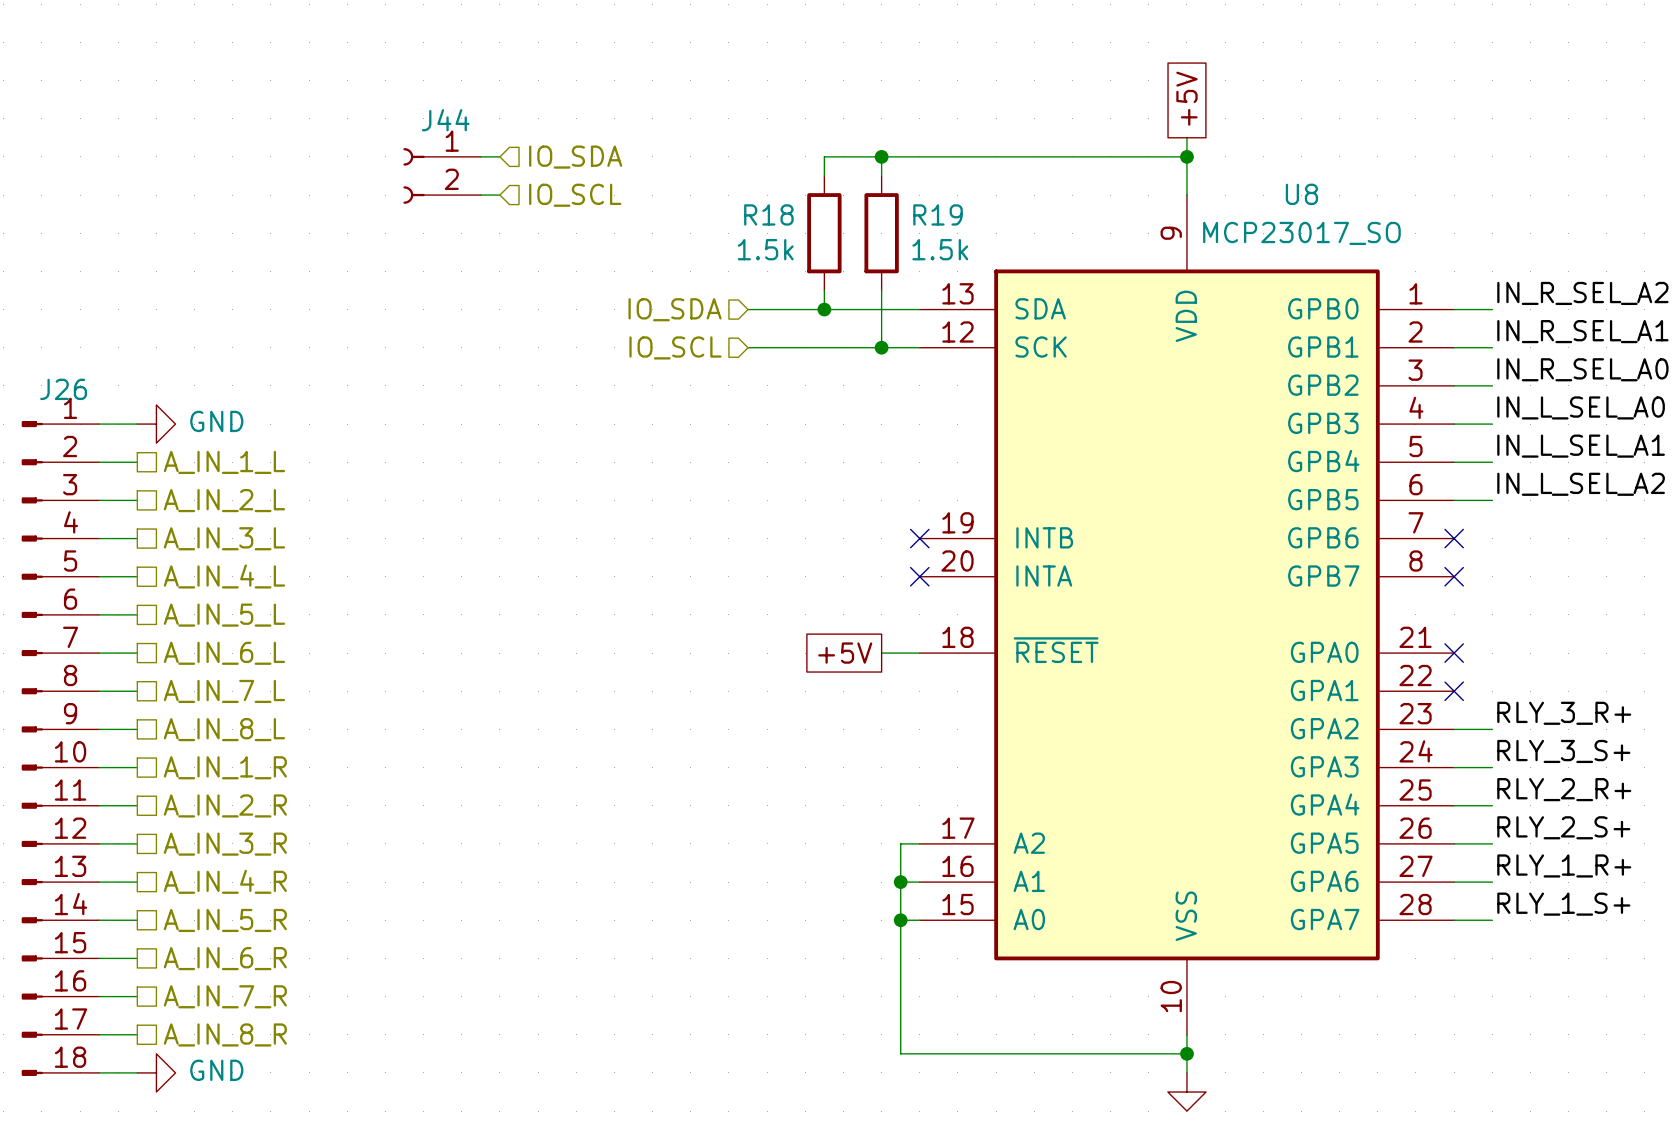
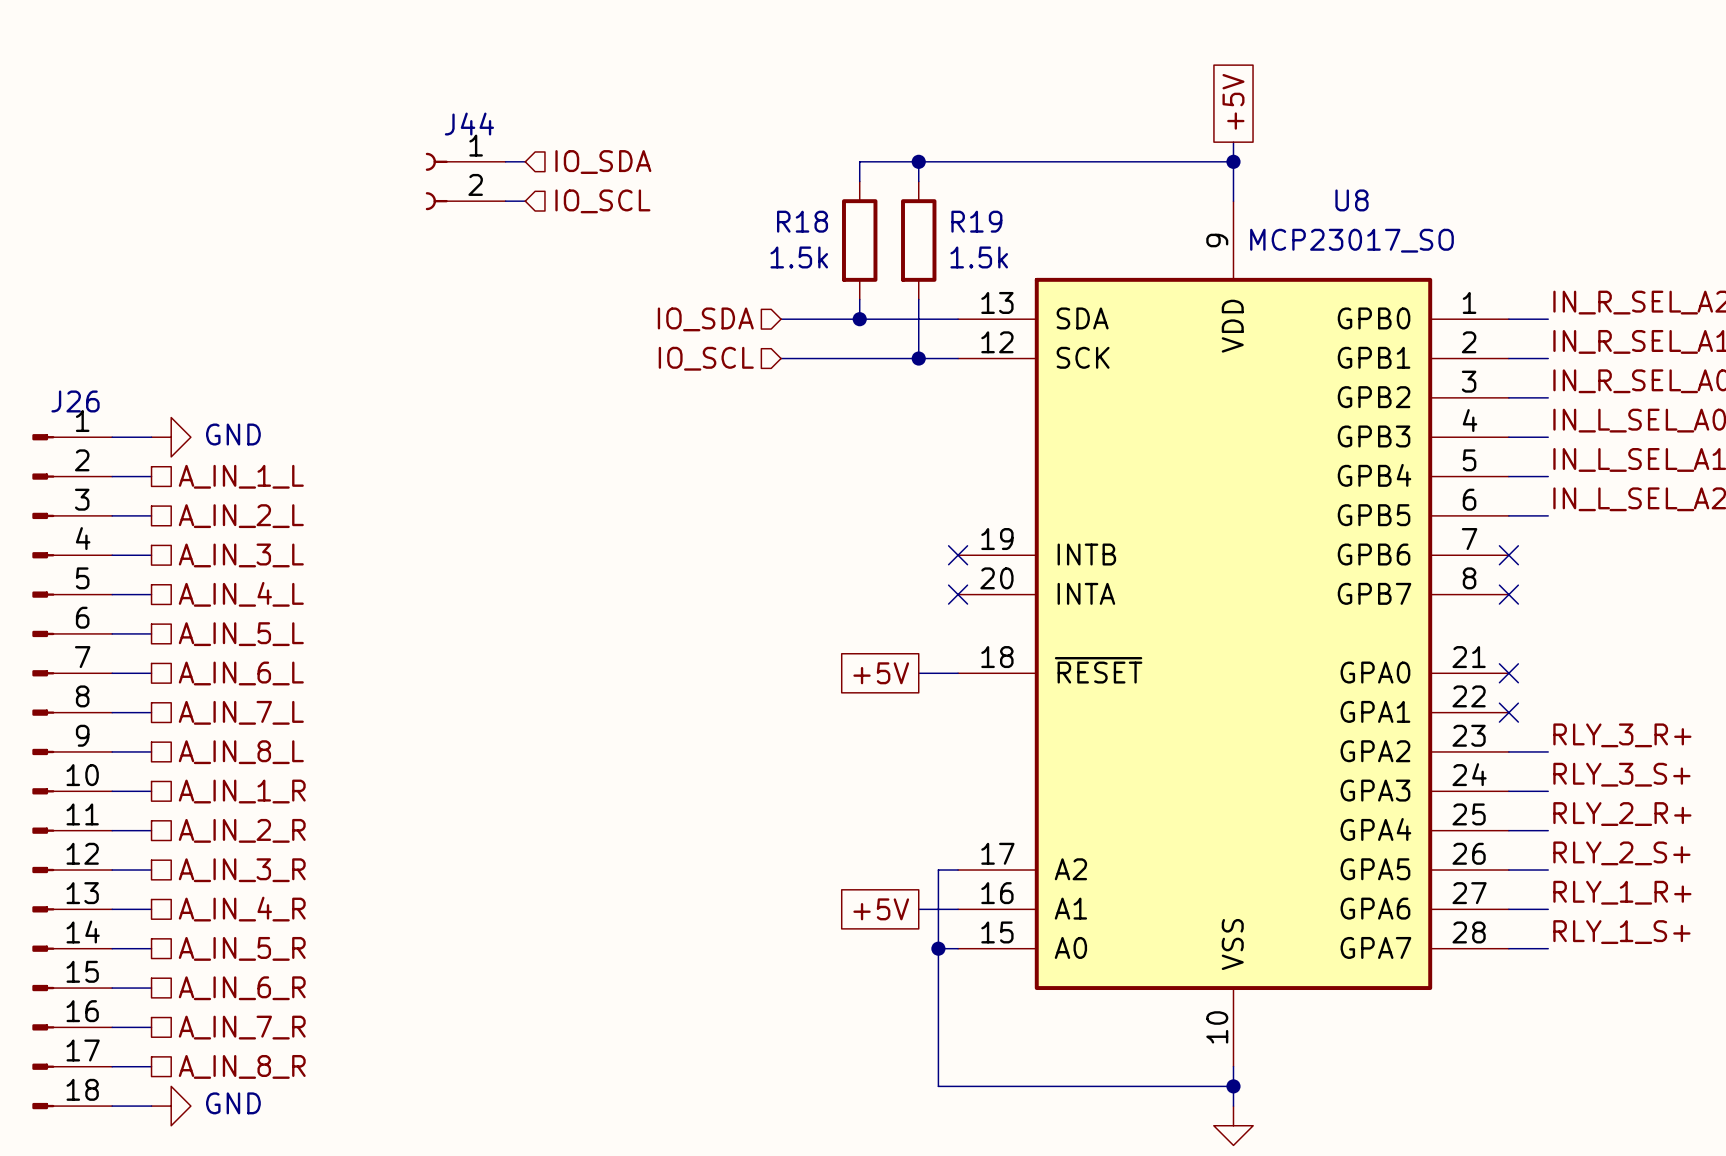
global label: none -> +5V (881, 909)
wire: none -> (918, 909) (938, 909)
junction: (900, 882) -> none

